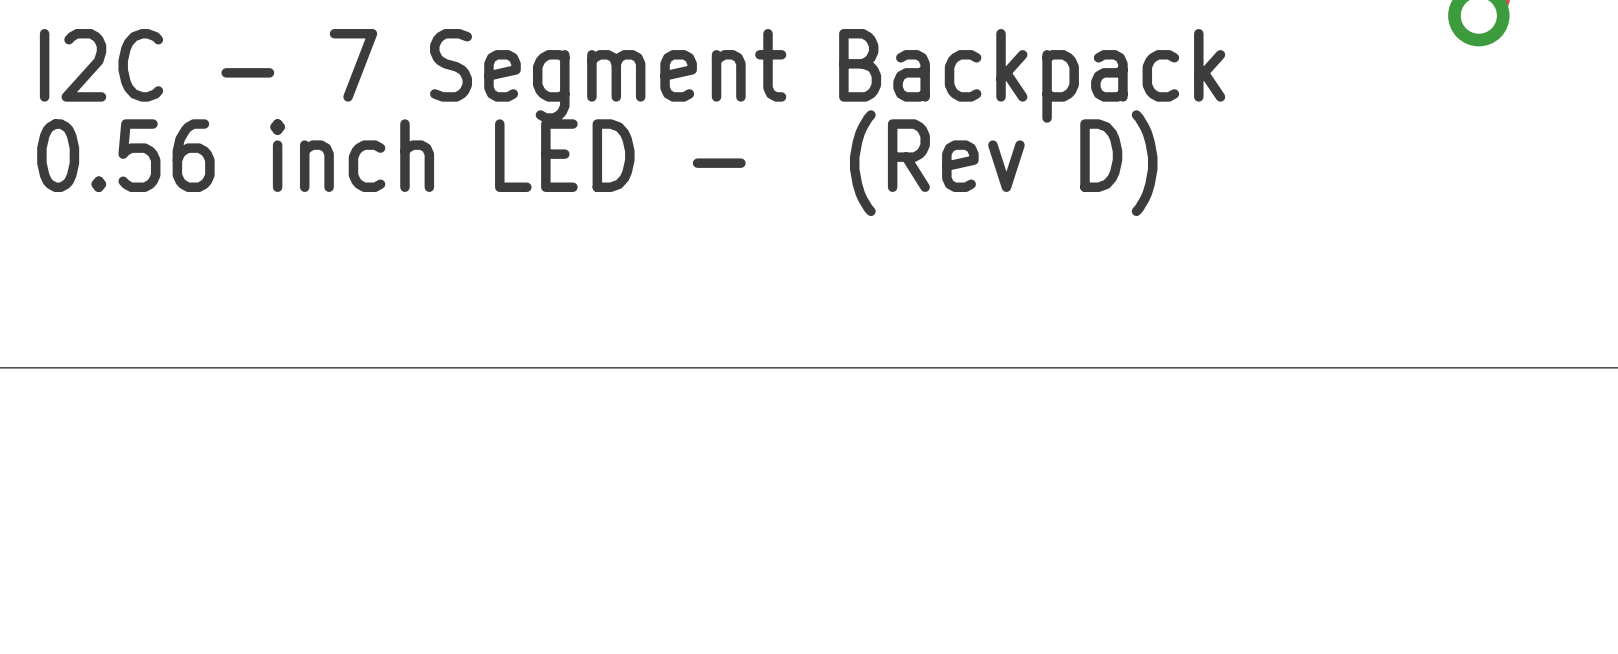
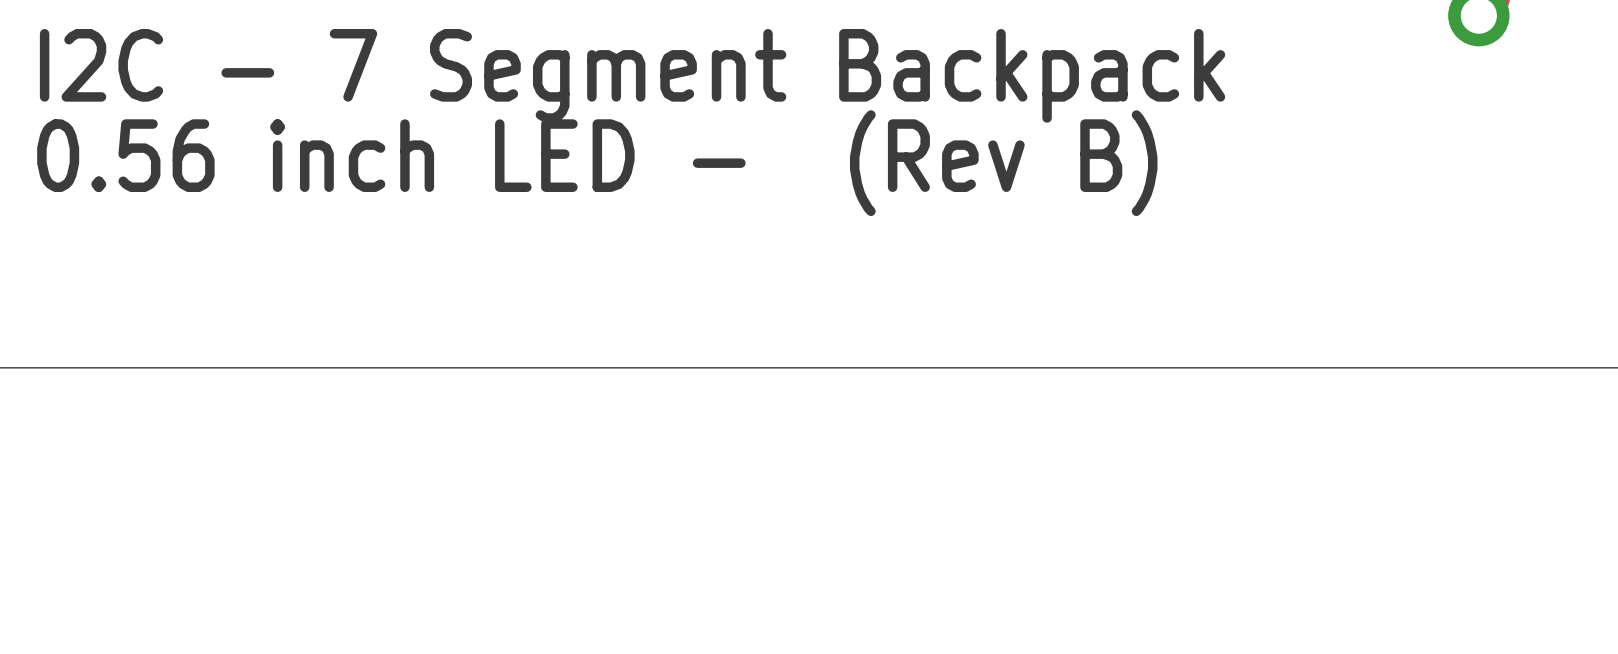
text: 0.56 inch LED - (Rev D) (597, 163) -> 0.56 inch LED - (Rev B) (597, 163)

